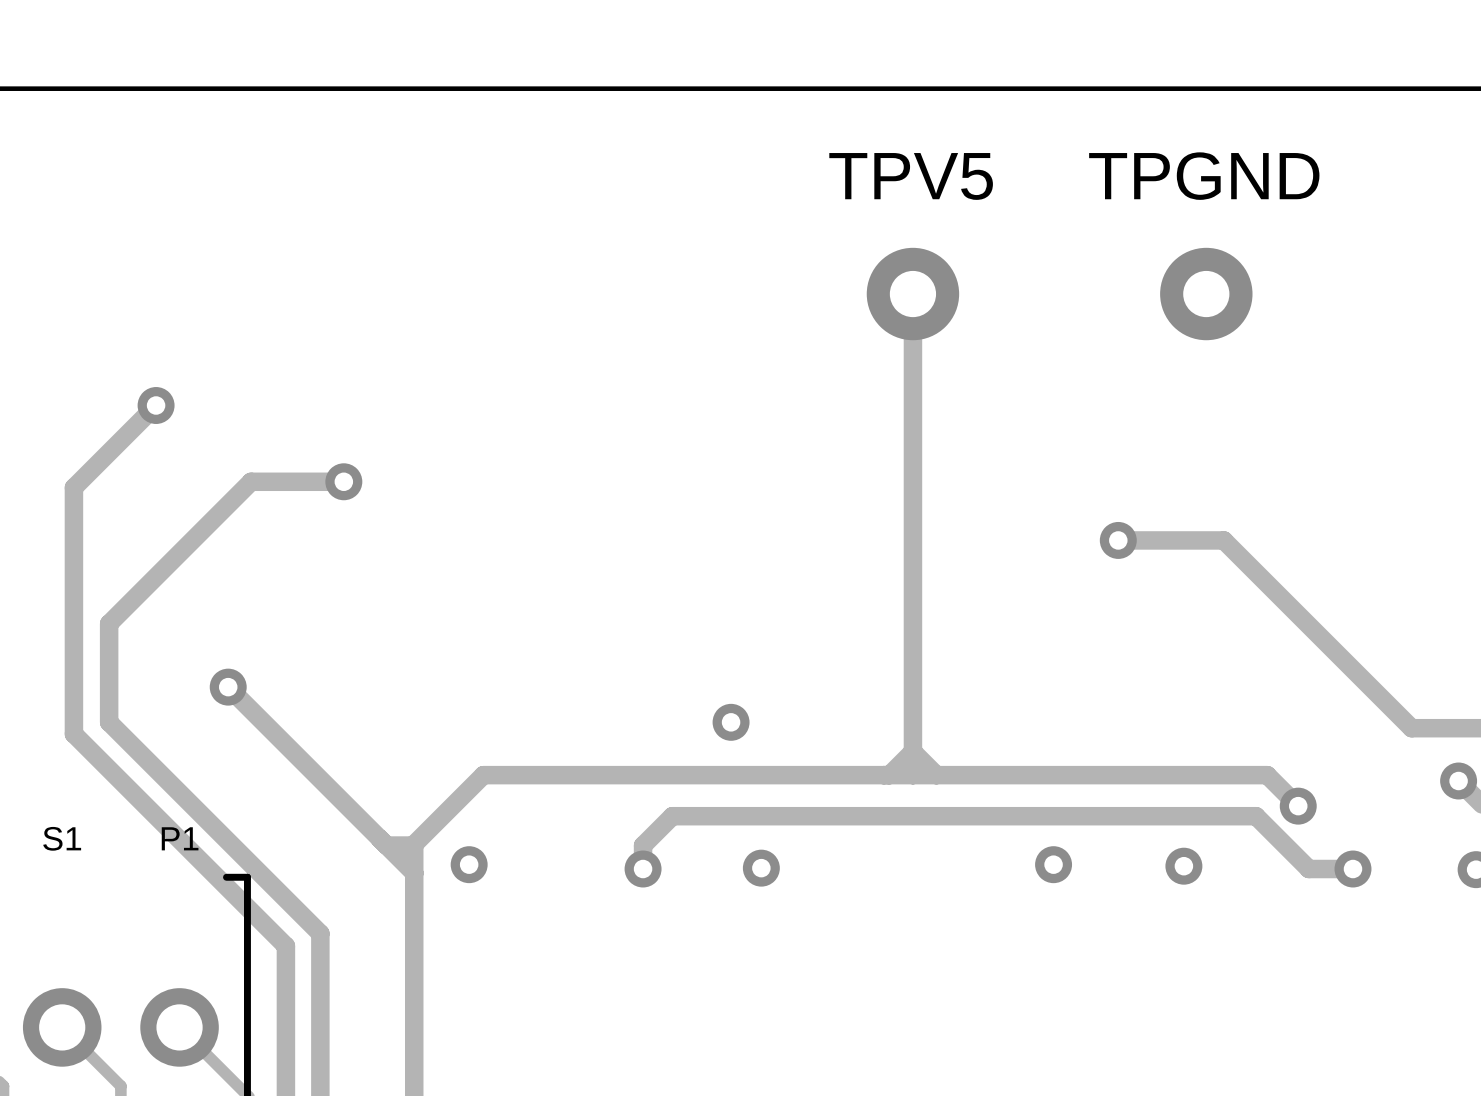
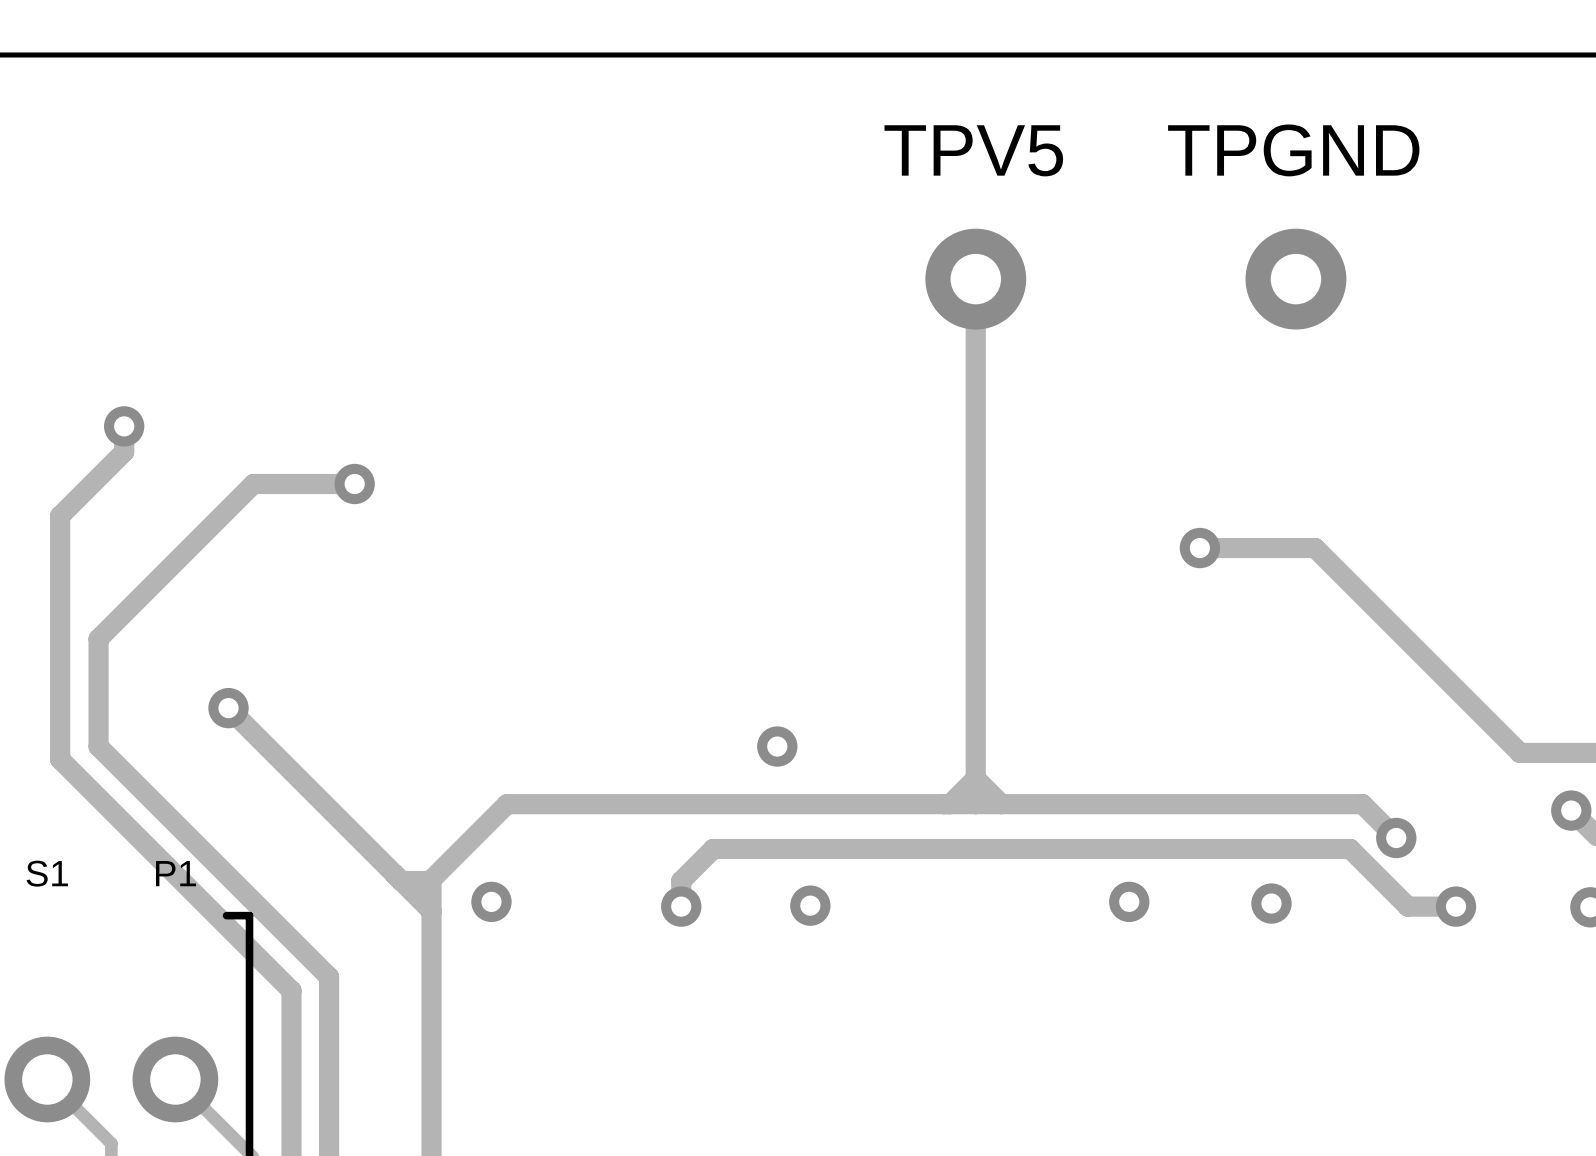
track: (156, 405) (73, 487) (73, 511) -> (124, 426) (124, 451) (60, 516)
via position: (156, 405) -> (124, 426)

